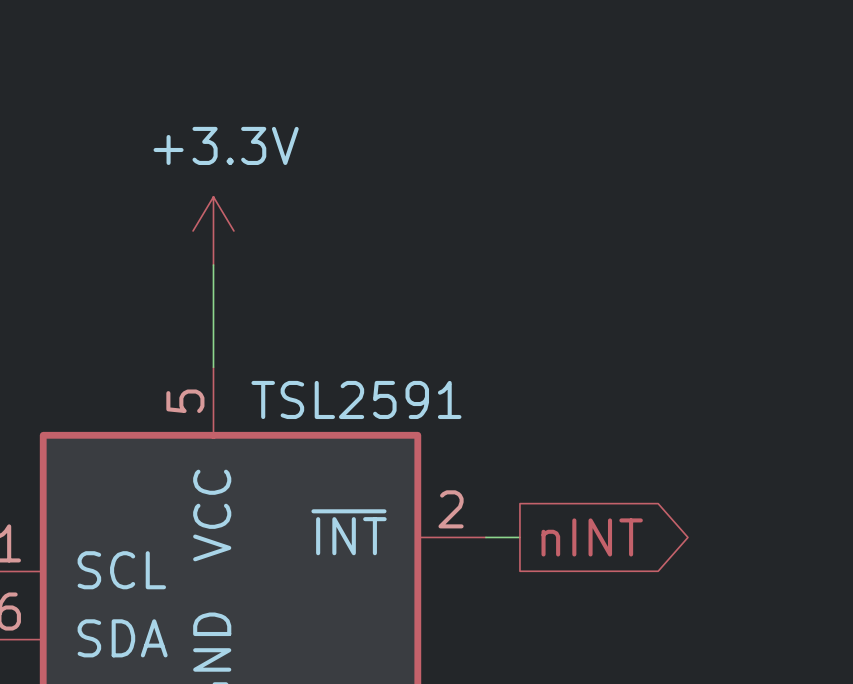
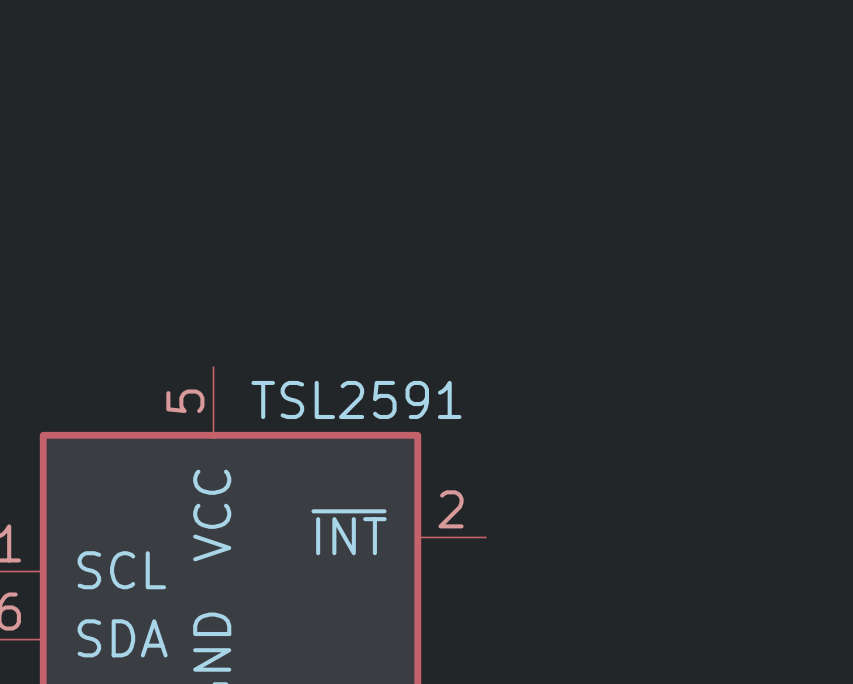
power symbol: +3.3V (213, 230) -> none
wire: (213, 265) (213, 367) -> none
wire: (485, 537) (519, 537) -> none
global label: nINT (592, 537) -> none

